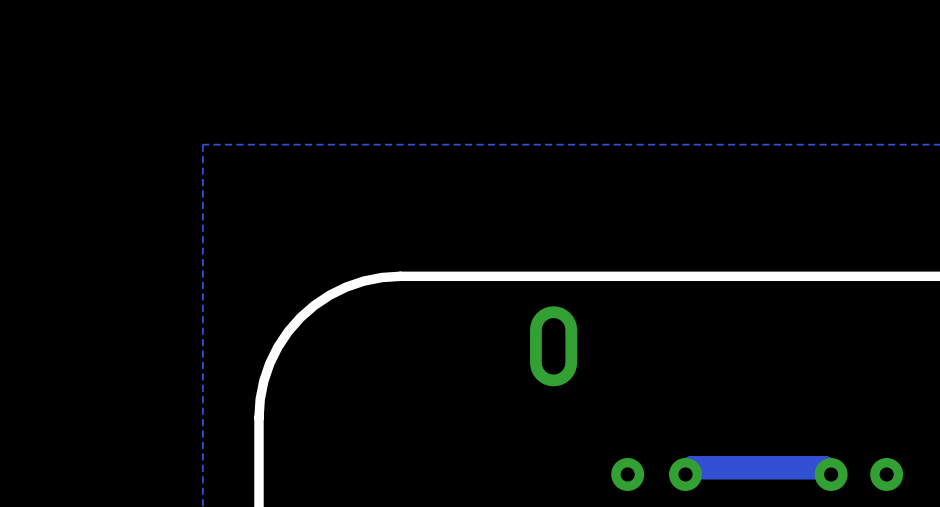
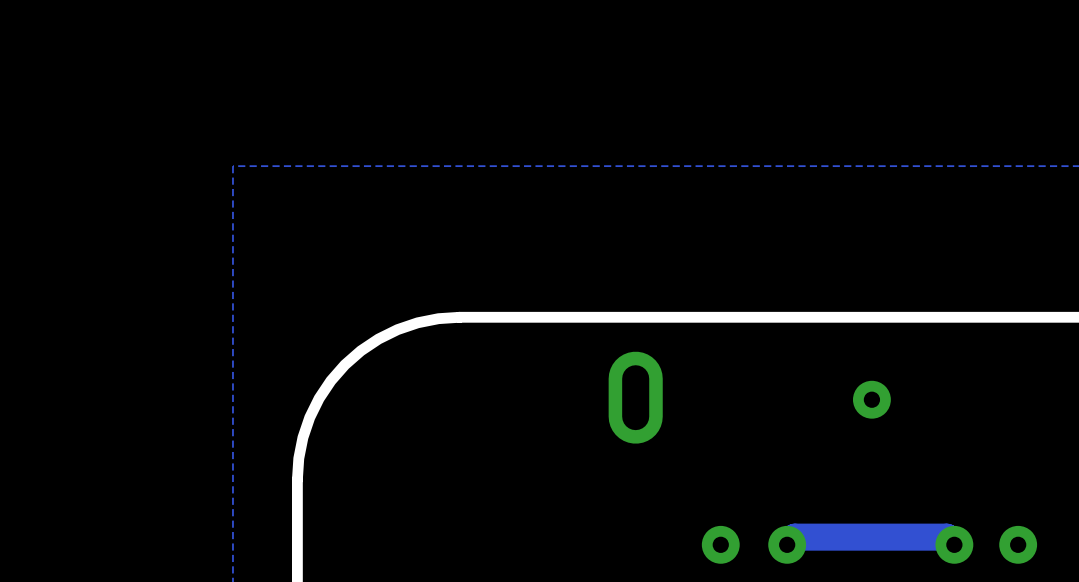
via: none -> (871, 399)

